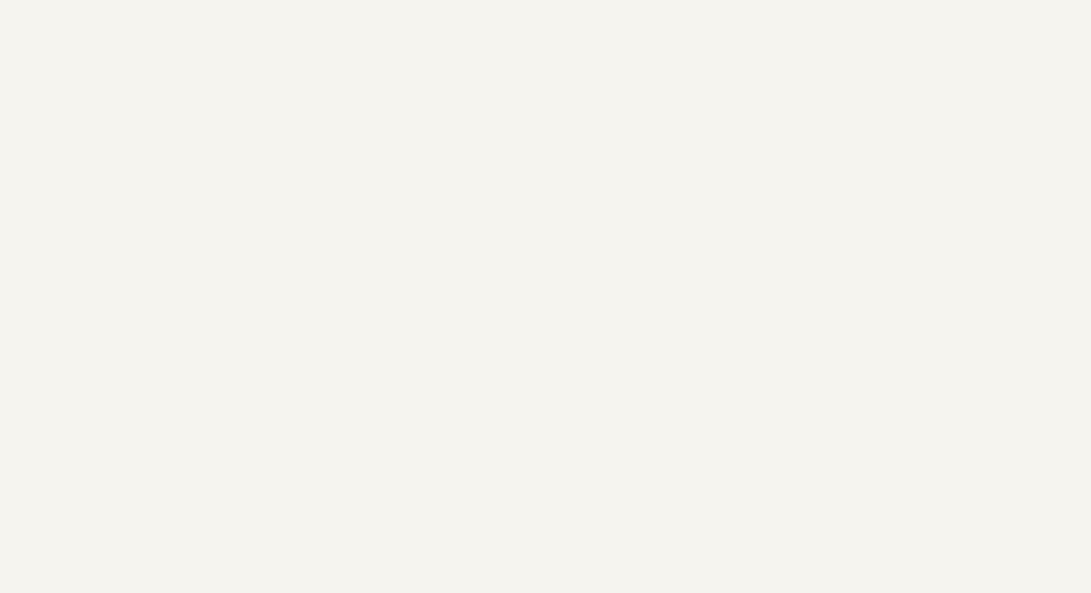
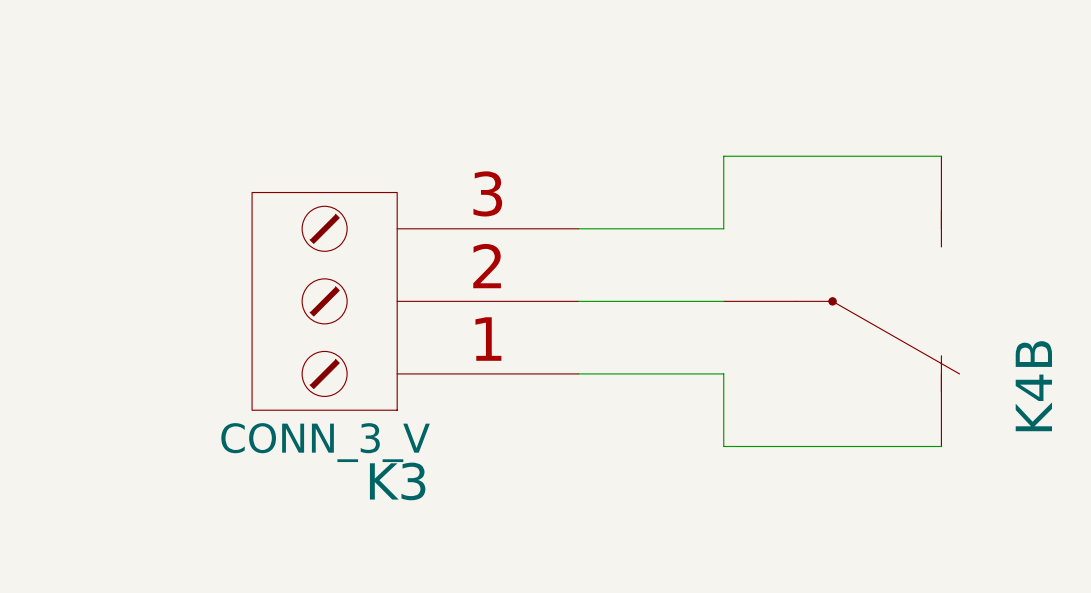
wire: none -> (941, 156) (723, 156) (723, 228) (578, 228)
K3: none -> CONN_3_V (364, 301)
wire: none -> (578, 301) (723, 301)
K4B: none -> (841, 301)
wire: none -> (578, 373) (723, 373) (723, 446) (941, 446)

